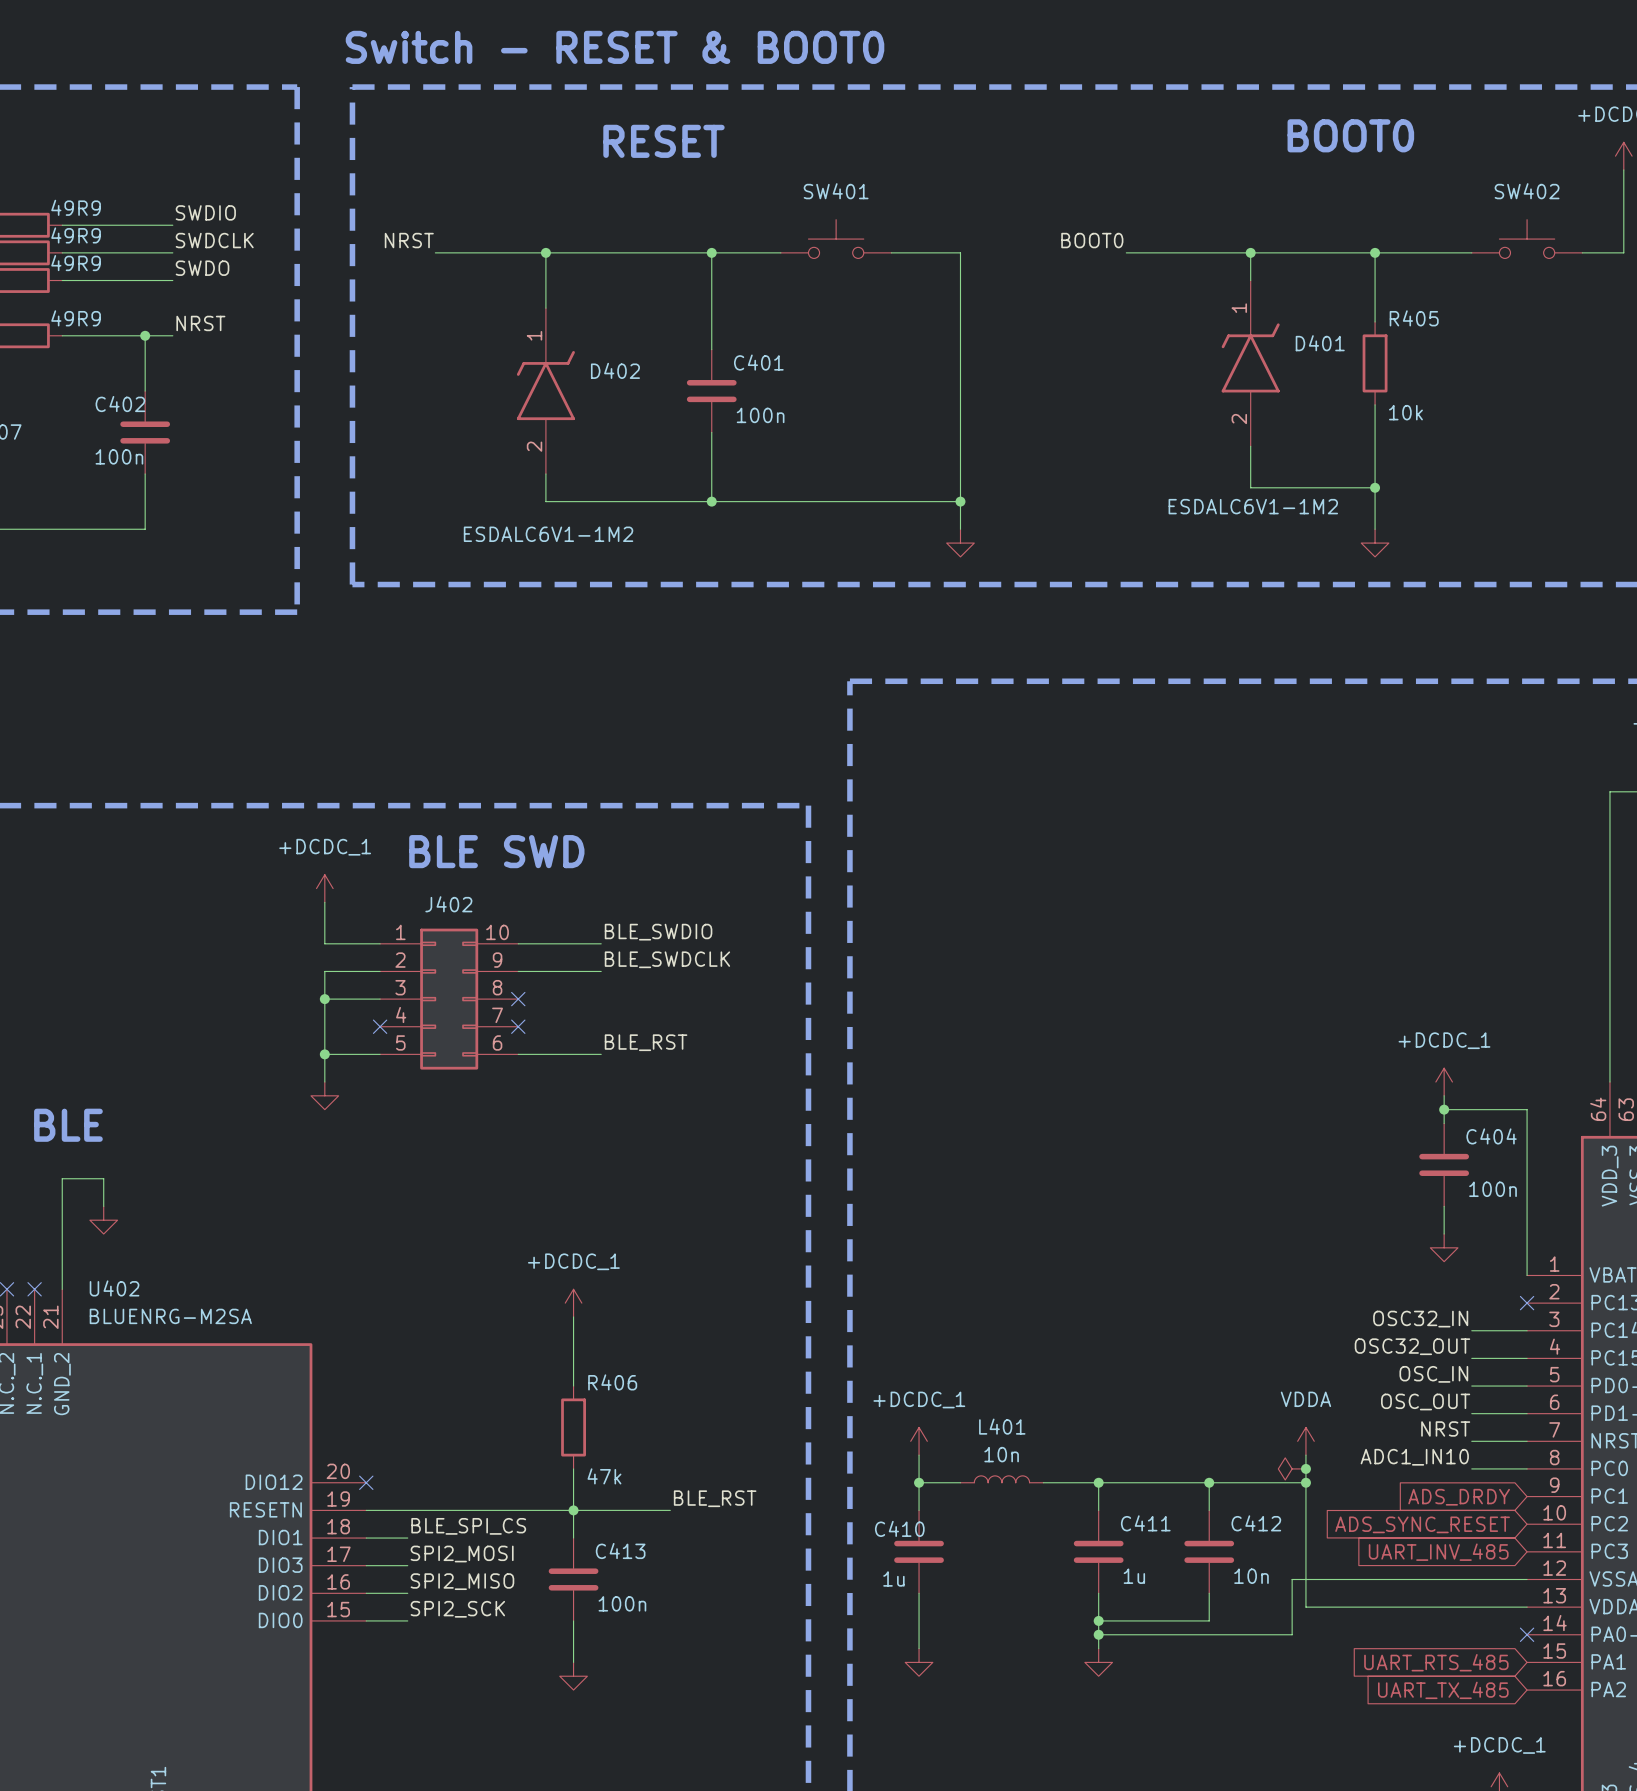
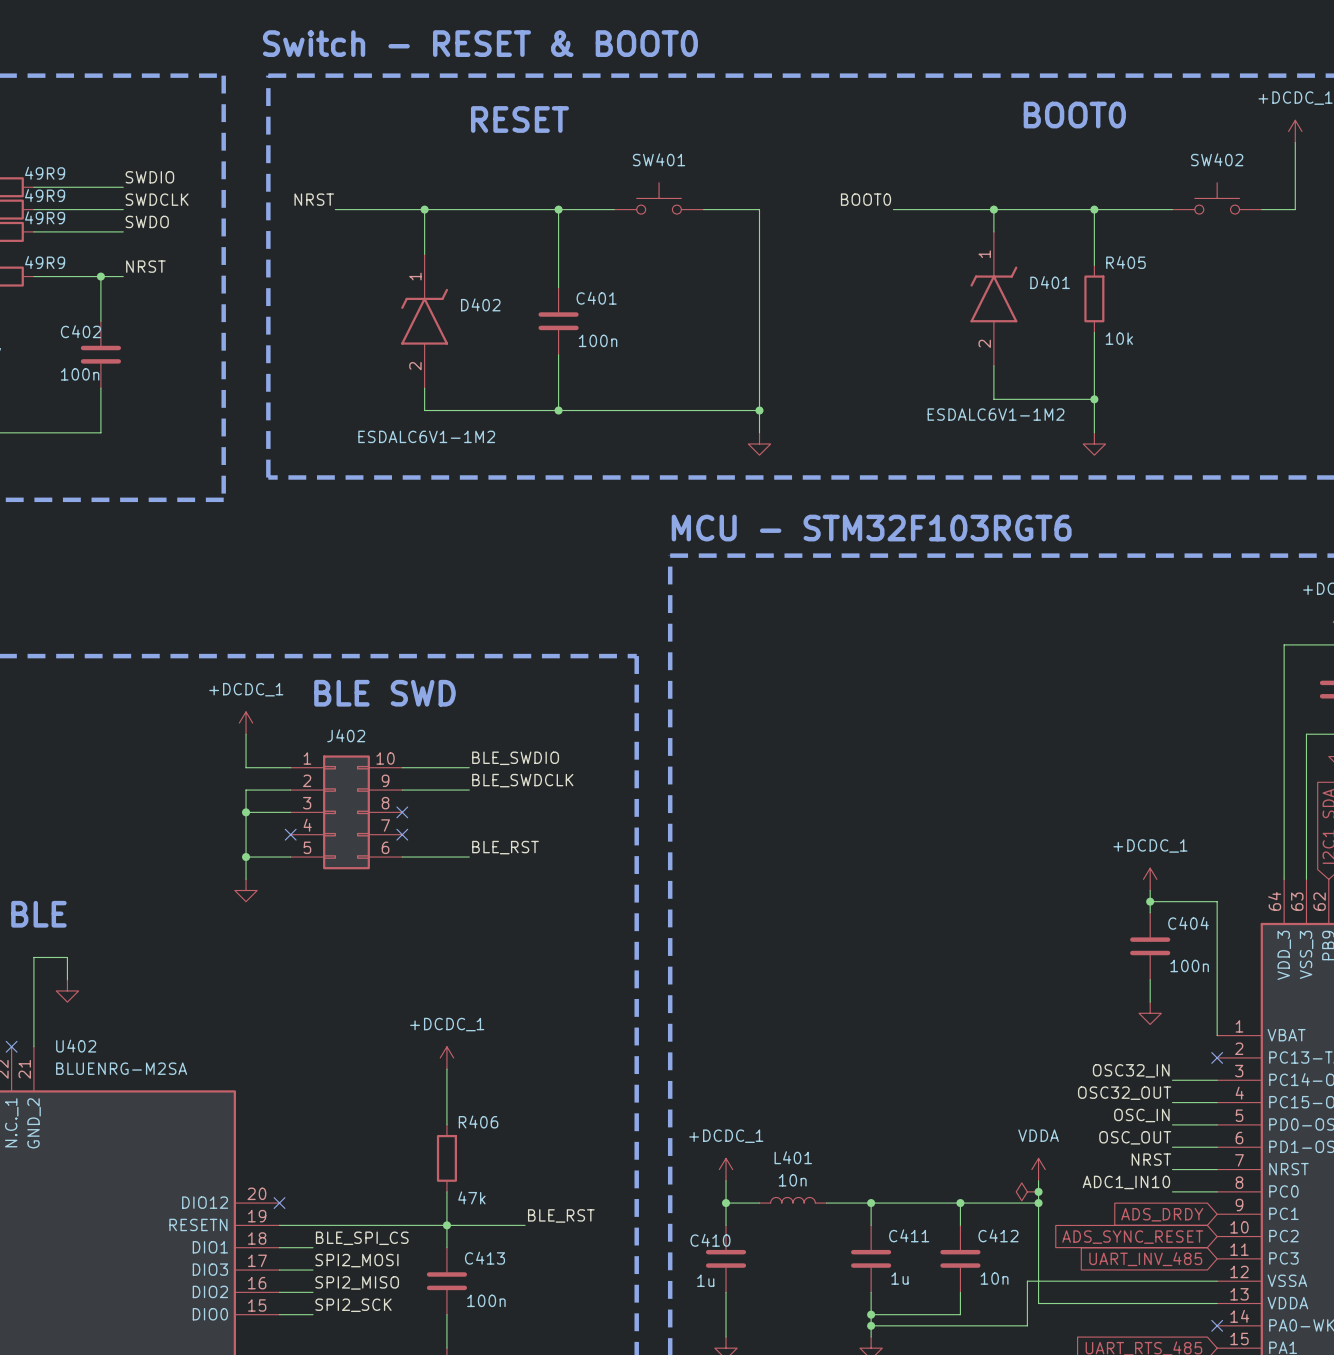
text: none -> MCU - STM32F103RGT6 (871, 528)

